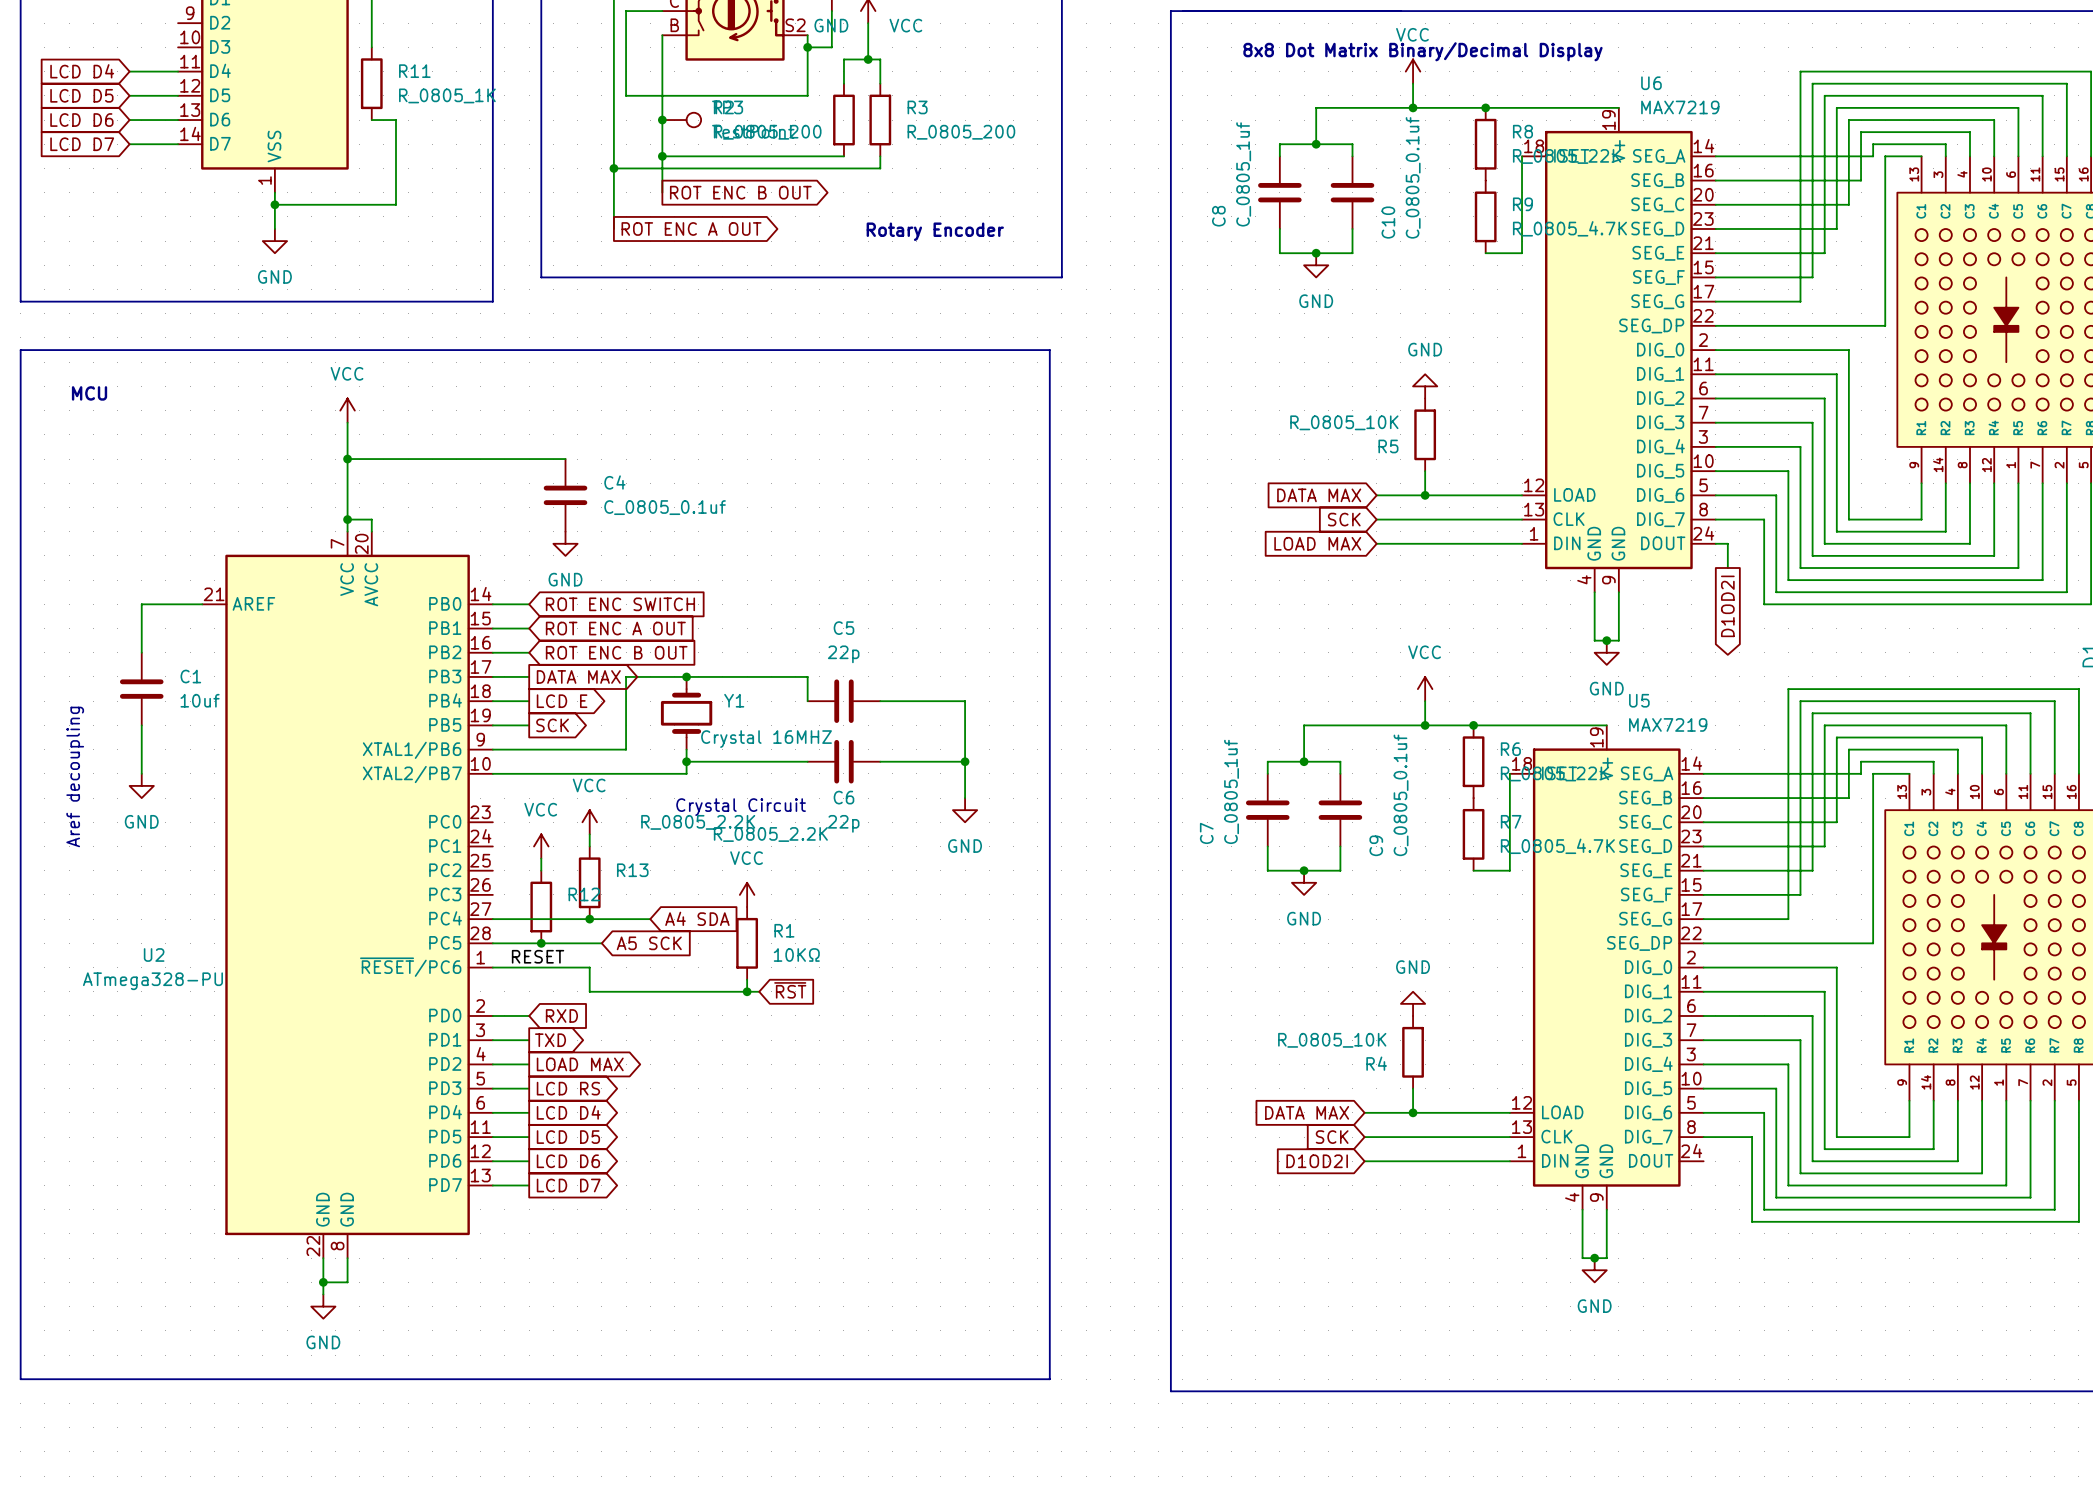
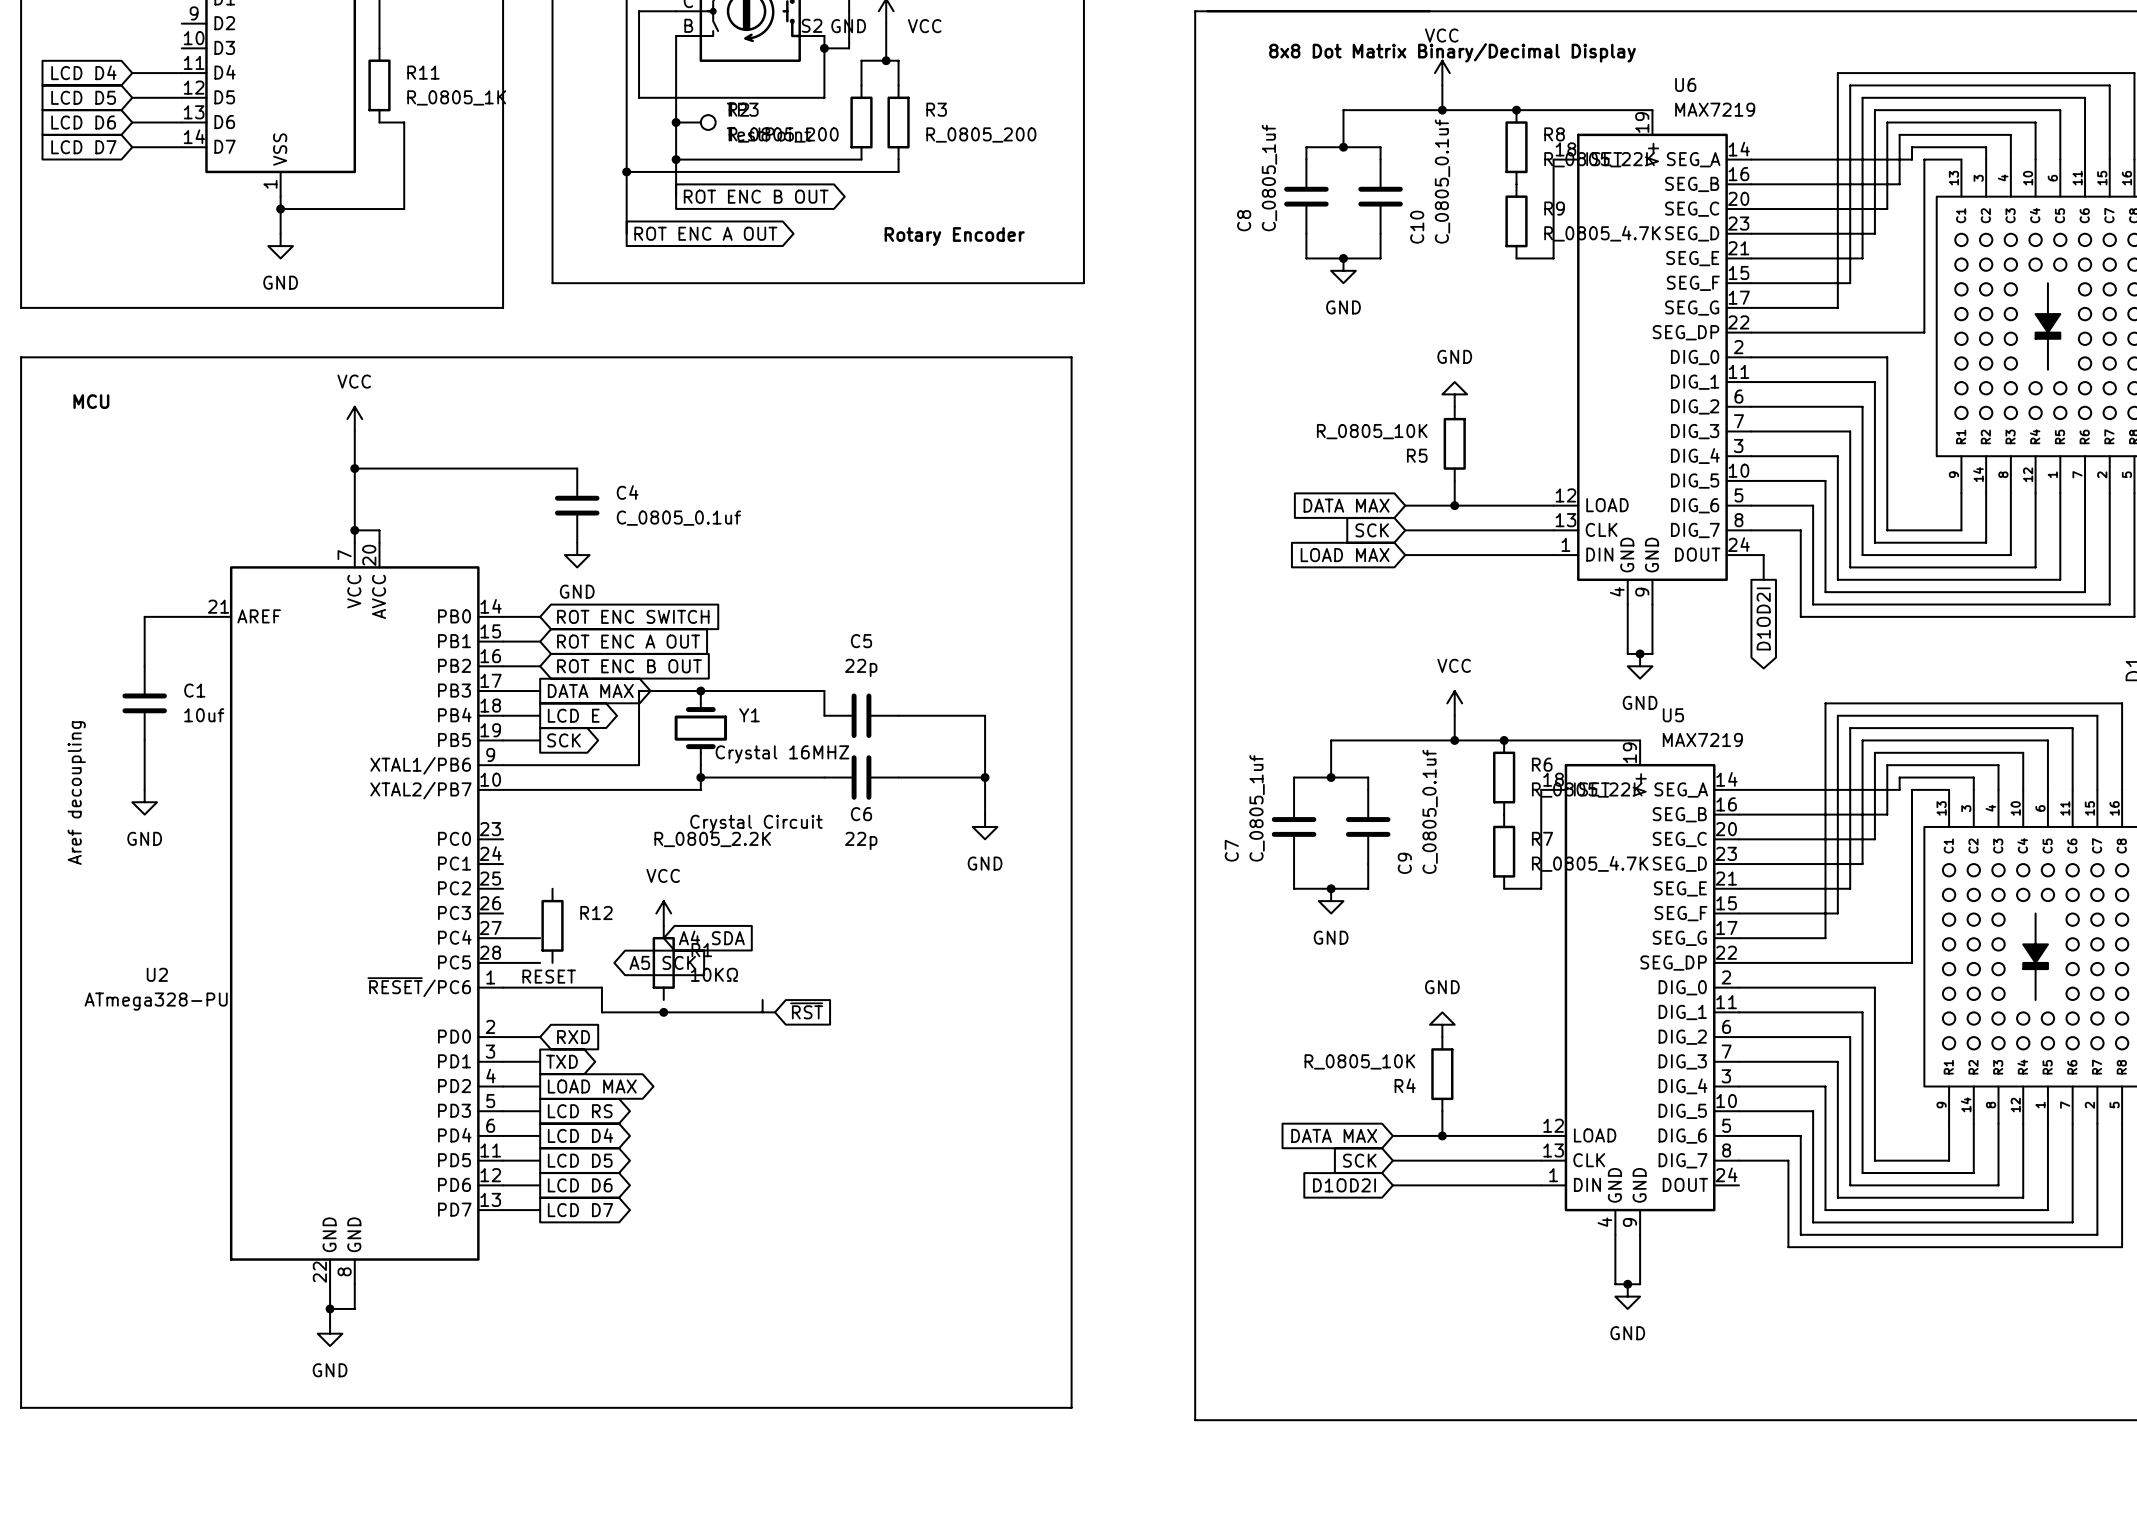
power symbol: VCC (589, 822) -> none
wire: (589, 834) (589, 846) -> none
power symbol: VCC (541, 846) -> none
wire: (541, 858) (541, 870) -> none
R13: R_0805_2.2K (589, 882) -> none
power symbol: none -> VCC (663, 913)
power symbol: VCC (747, 894) -> none
wire: (529, 919) (650, 919) -> none
junction: (589, 919) -> none
wire: (529, 943) (601, 943) -> none
junction: (541, 943) -> none
R1 position: (747, 943) -> (663, 962)
junction: none -> (663, 1012)
junction: (747, 991) -> none

